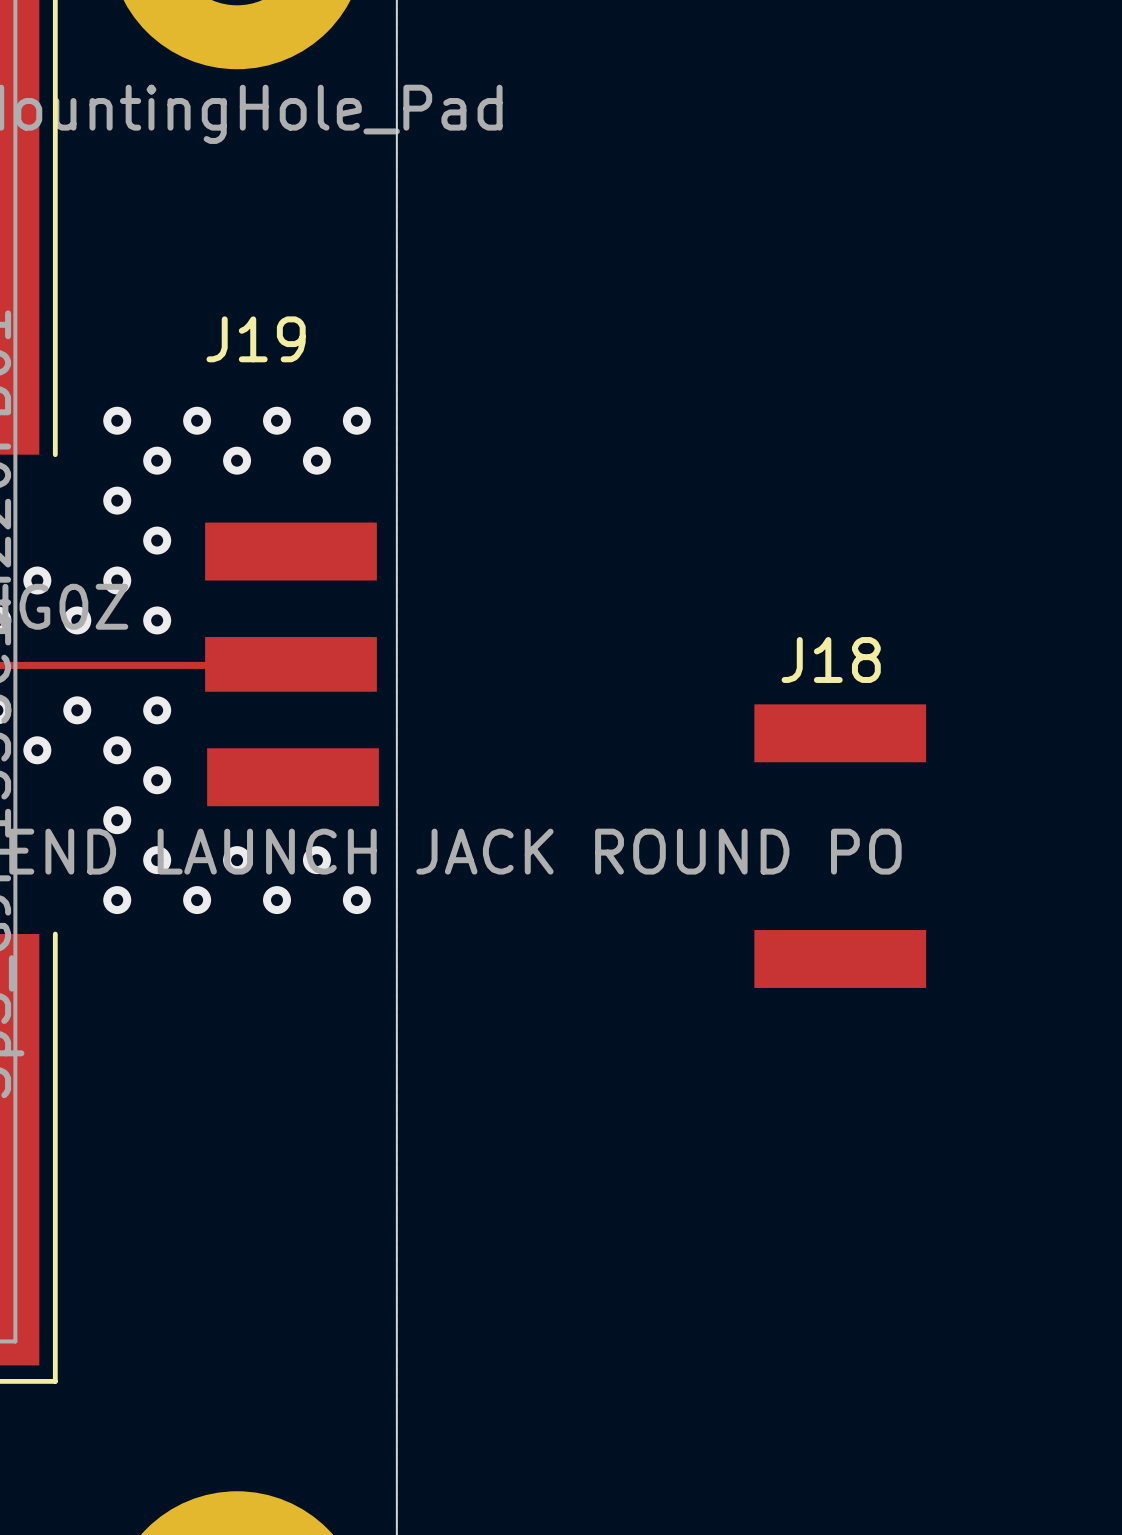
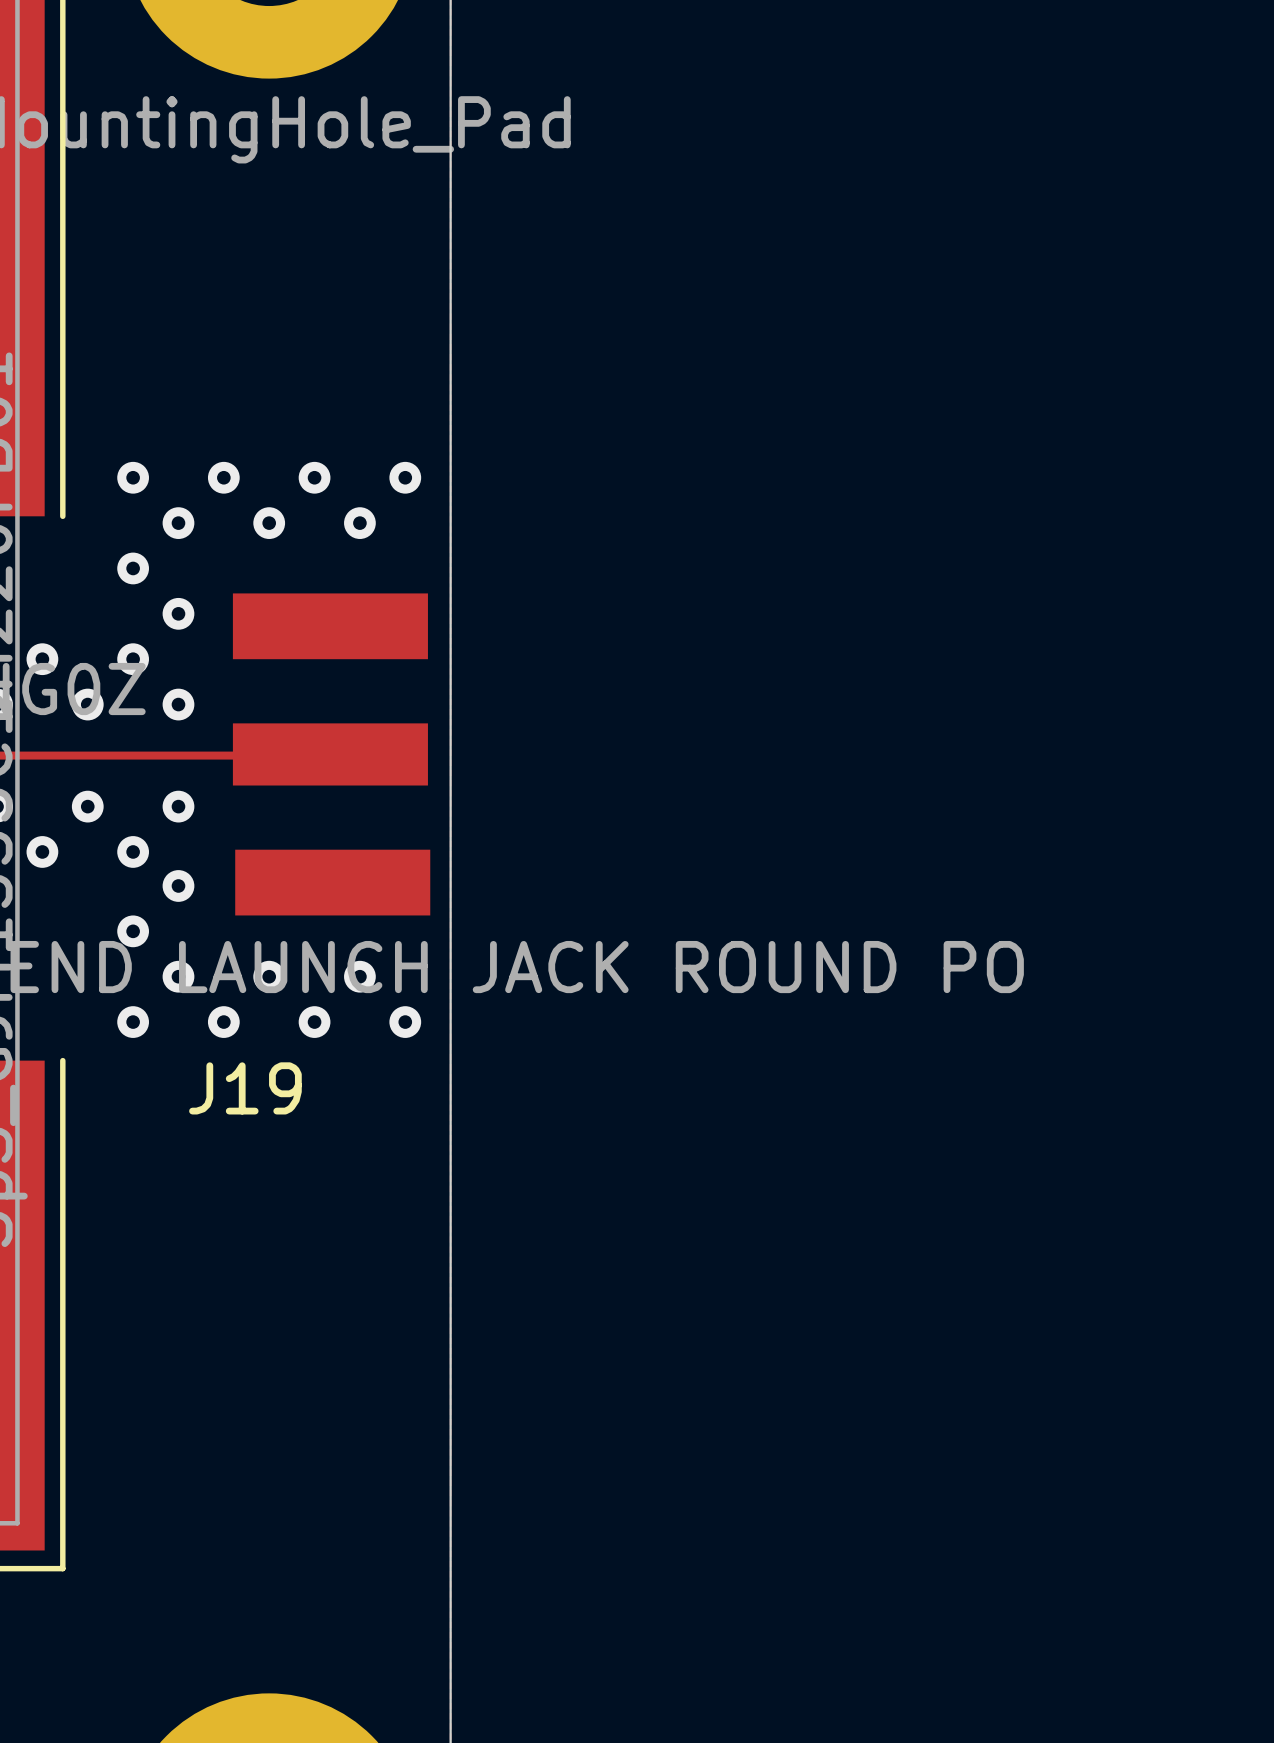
J19 name position: J19 (256, 339) -> J19 (245, 1088)
J18: (840, 846) -> none

